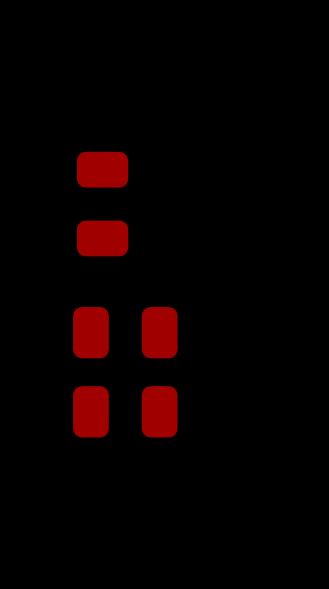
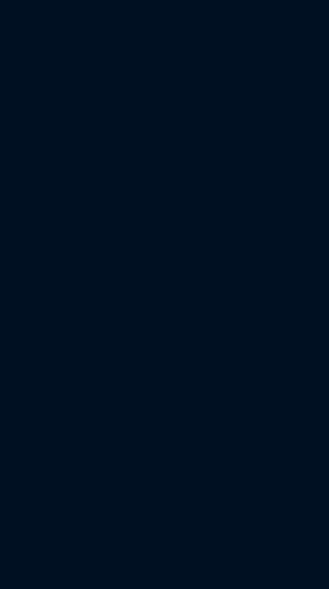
part: (102, 204) -> none
part: (125, 332) -> none
part: (125, 411) -> none

